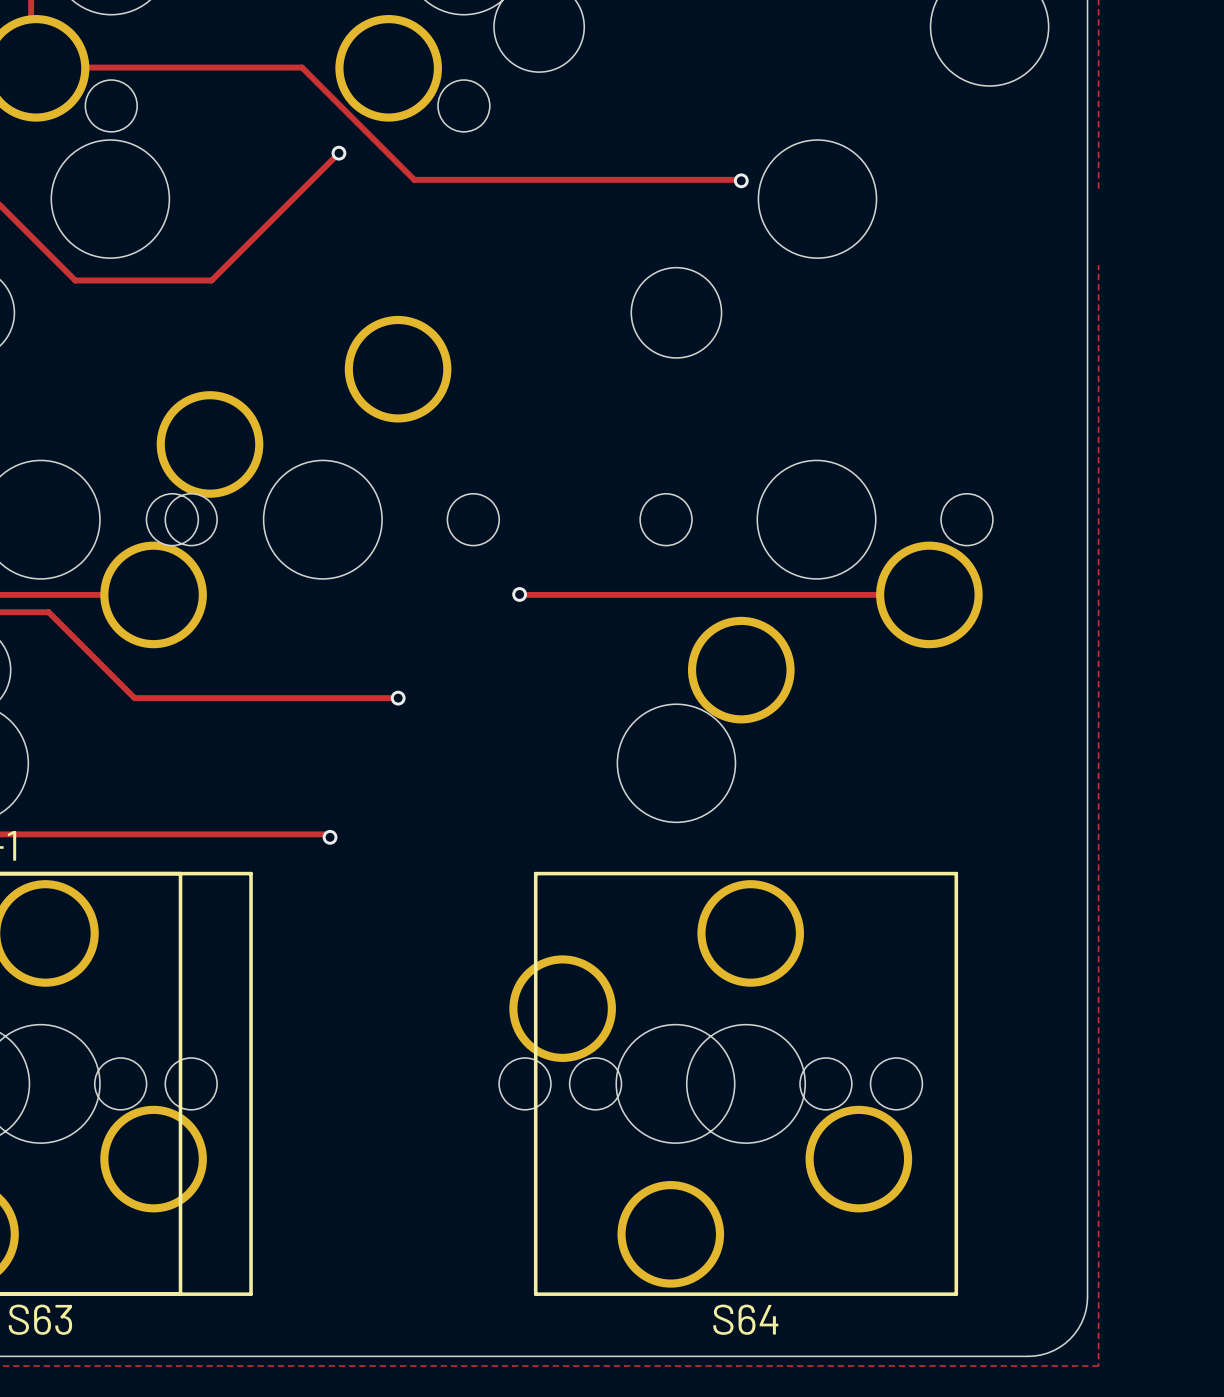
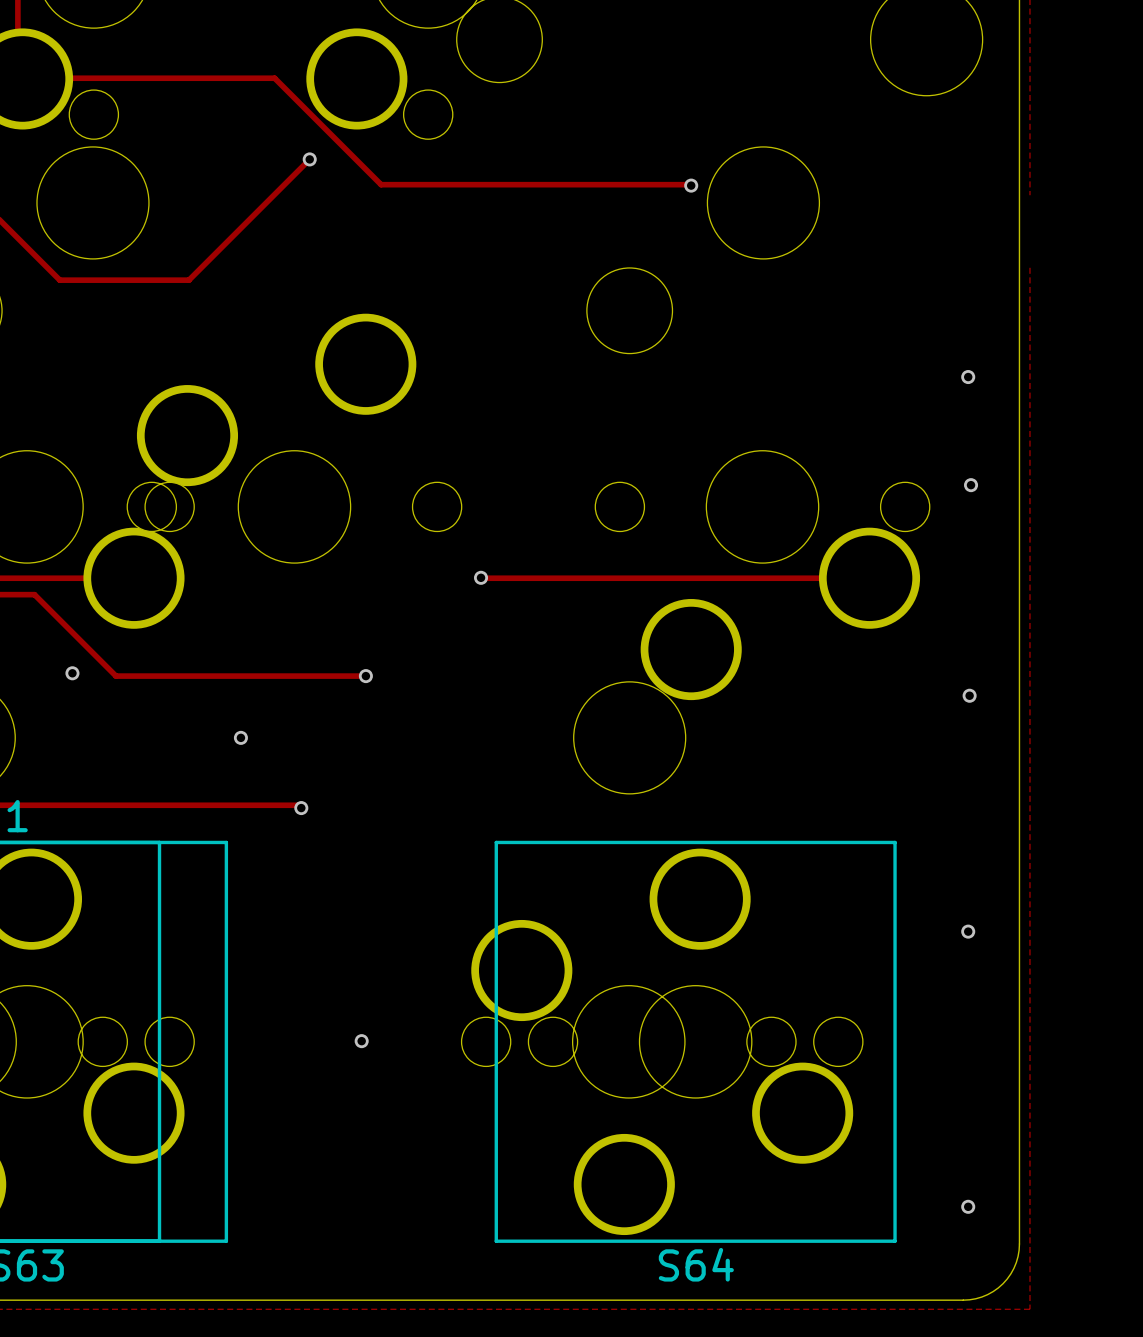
via: none -> (968, 377)
via: none -> (971, 485)
via: none -> (72, 673)
via: none -> (969, 695)
via: none -> (240, 737)
via: none -> (968, 931)
via: none -> (361, 1041)
via: none -> (968, 1206)

